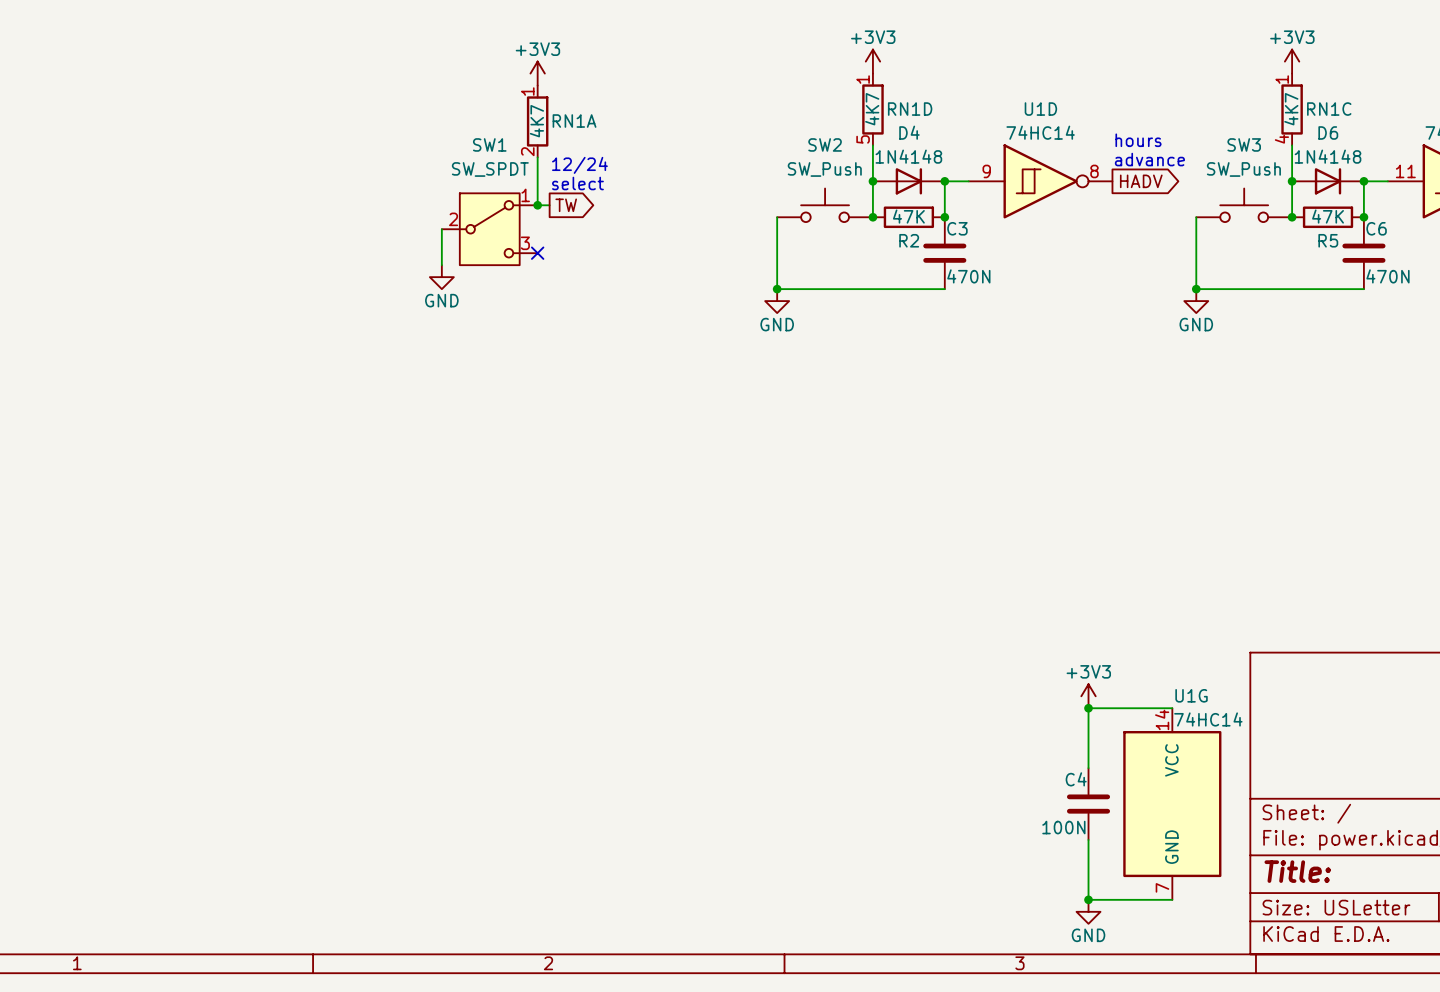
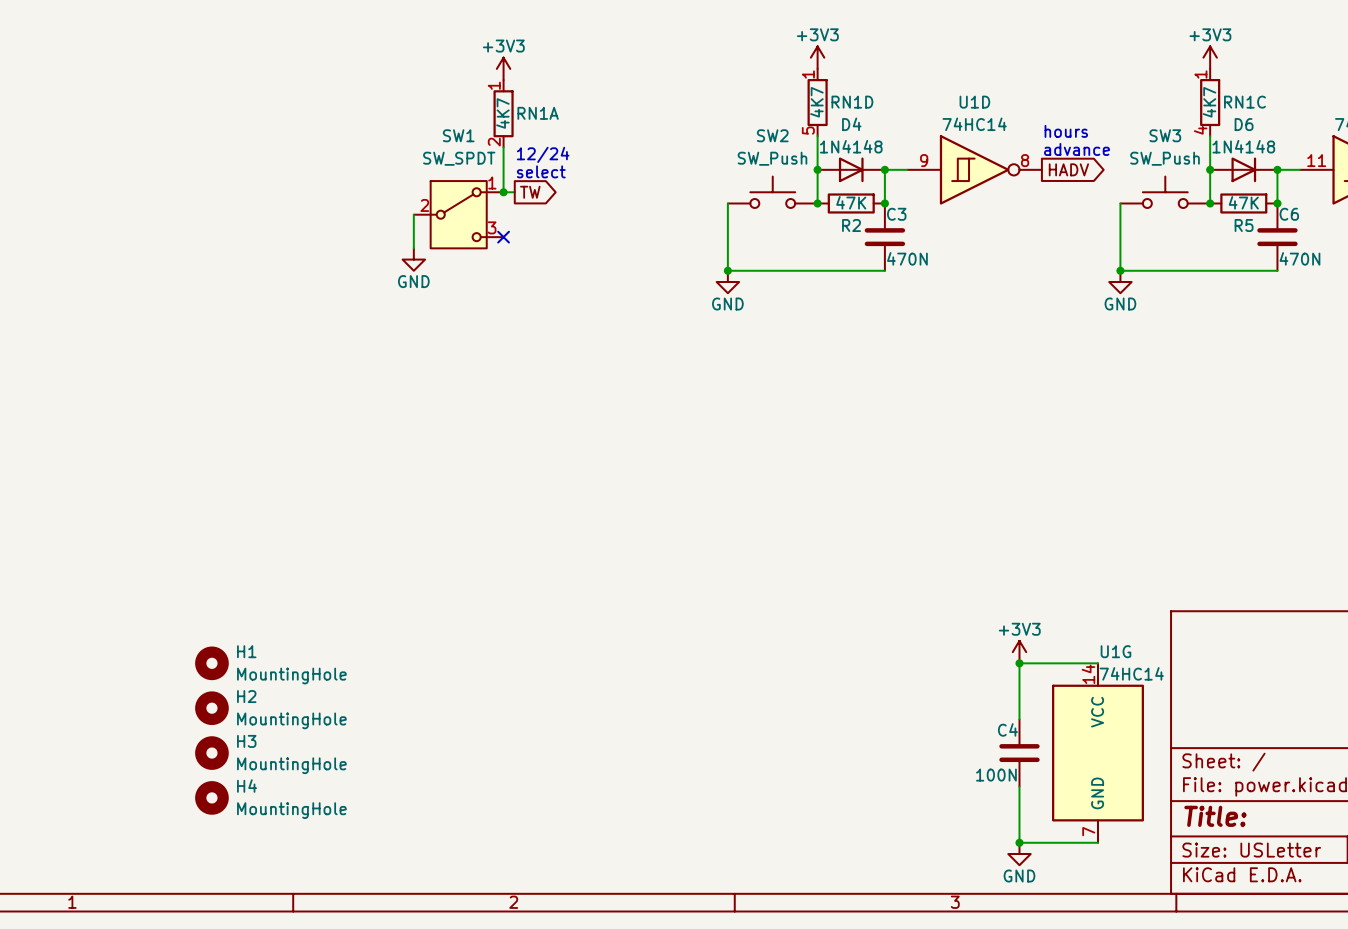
H1: none -> MountingHole (211, 663)
H2: none -> MountingHole (211, 708)
H3: none -> MountingHole (211, 753)
H4: none -> MountingHole (211, 797)

